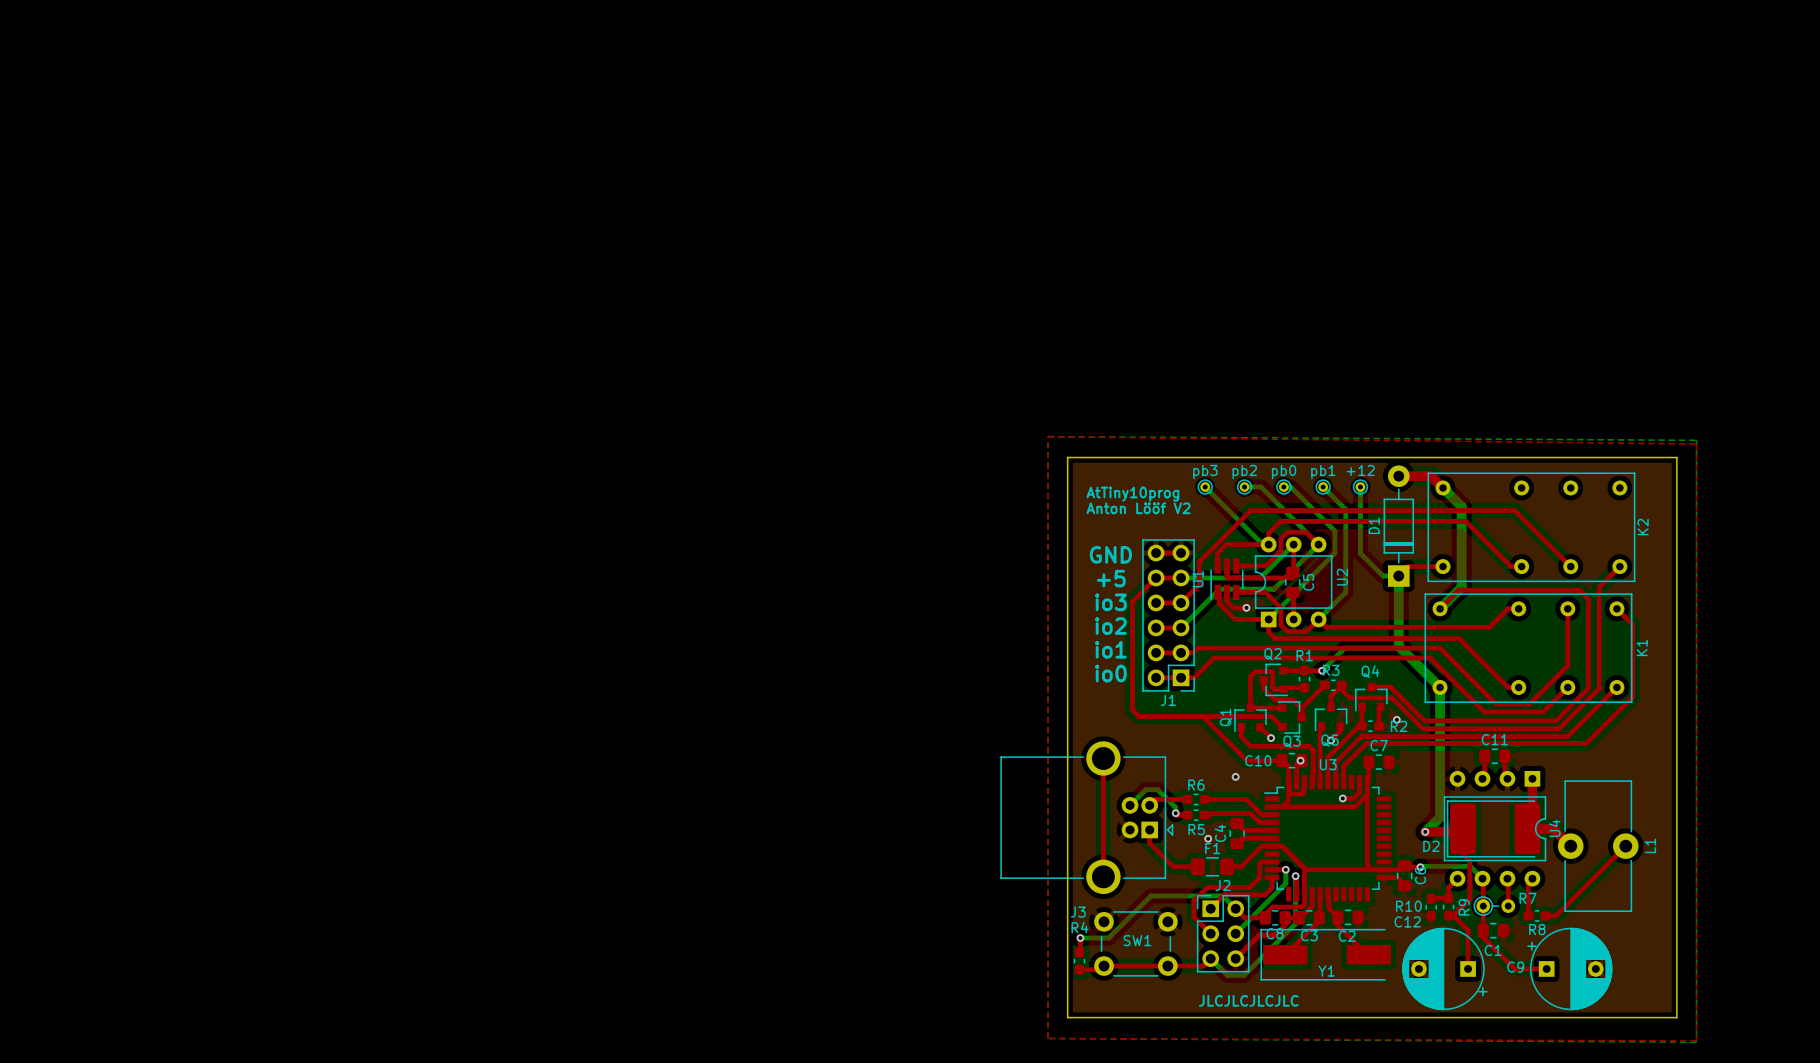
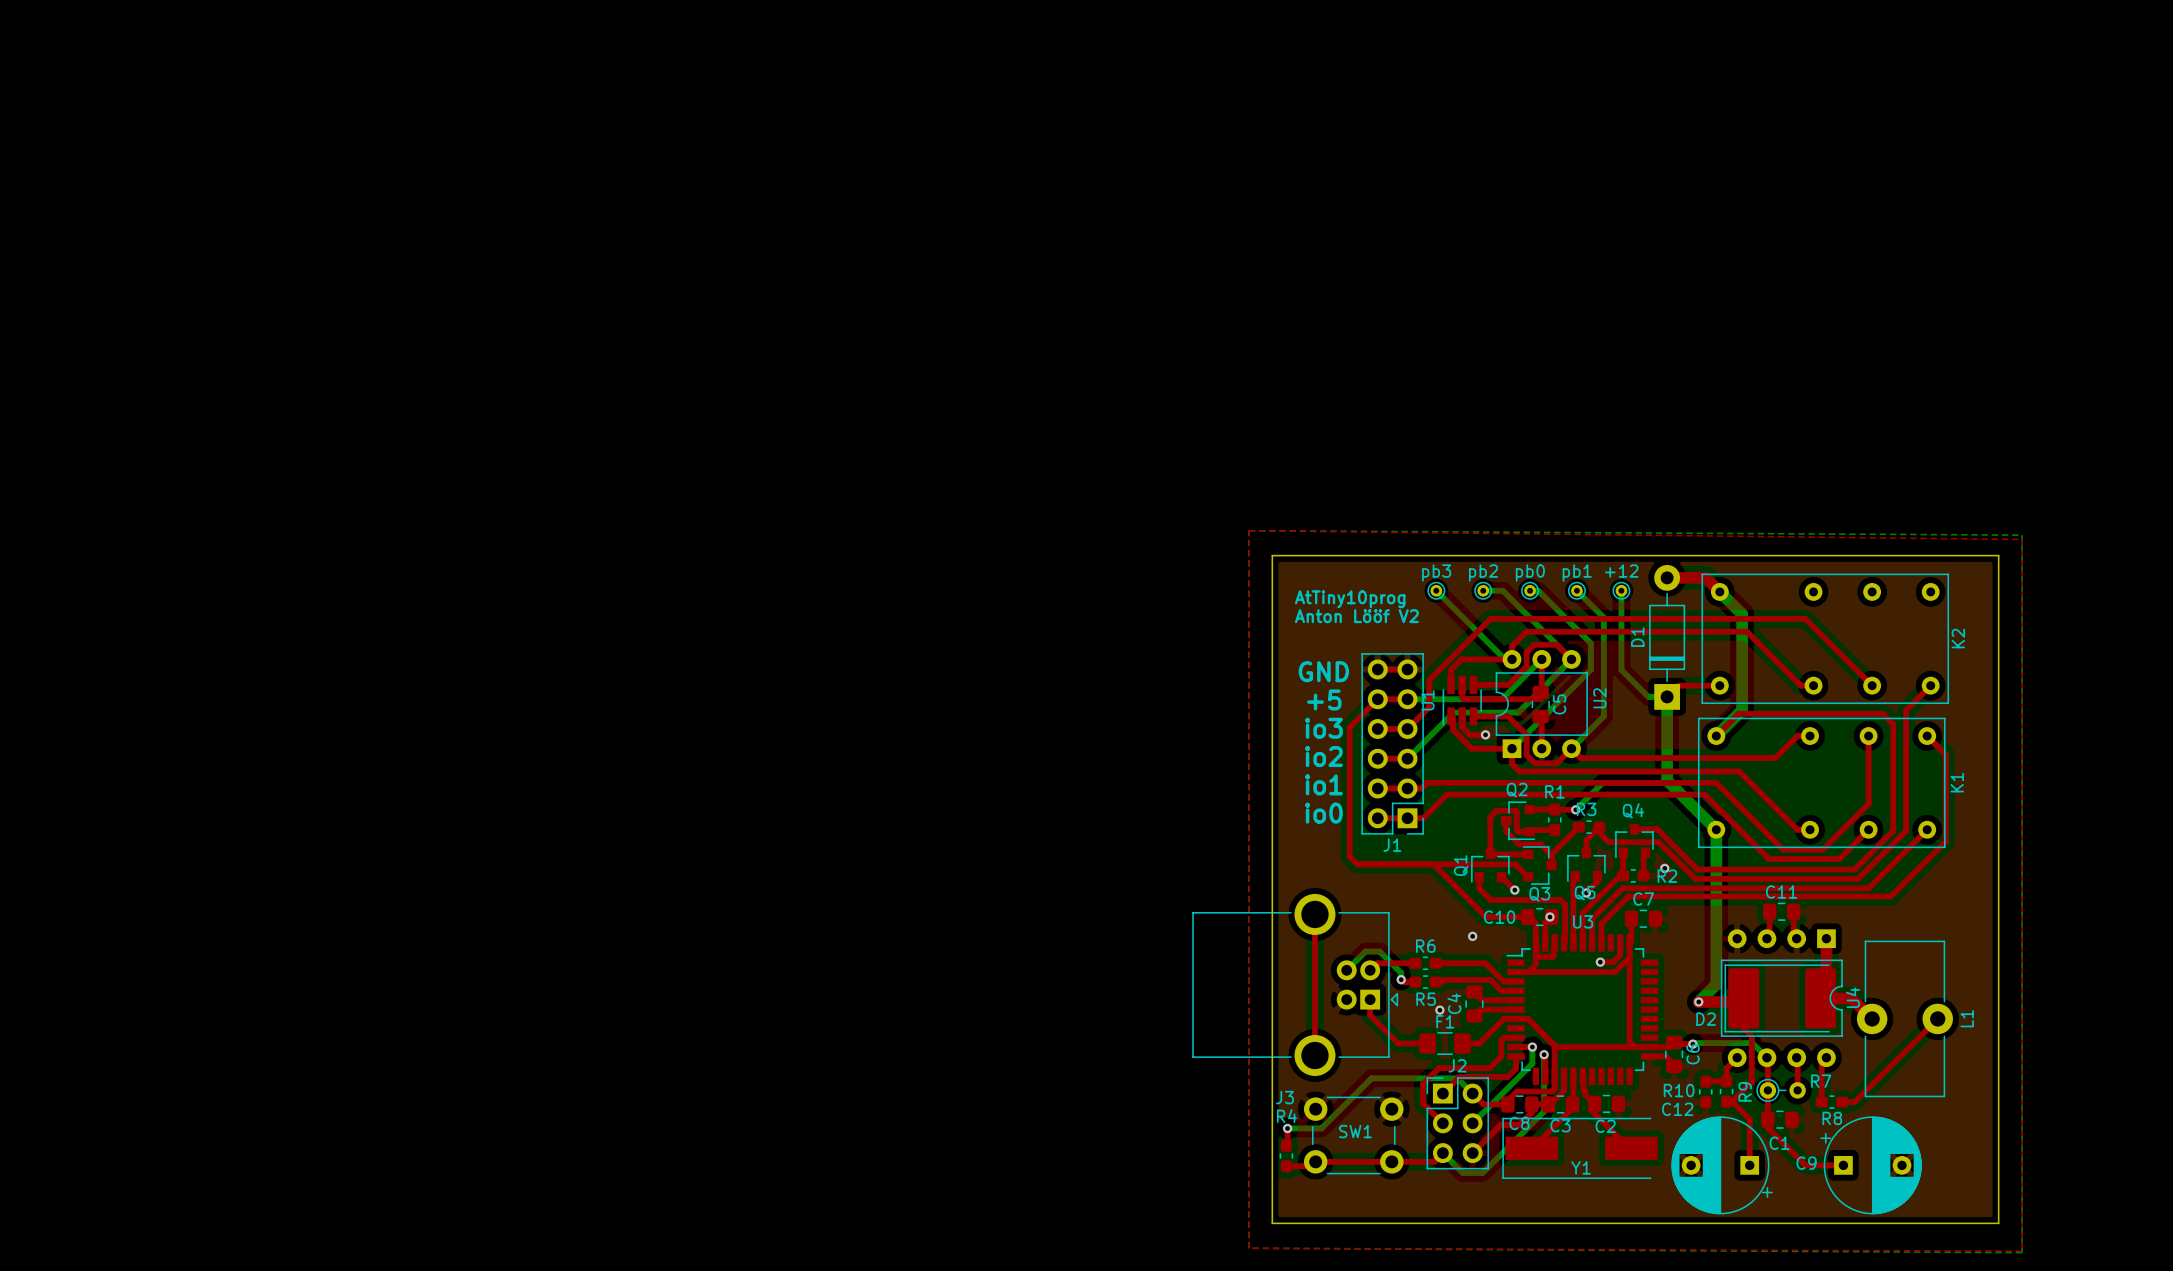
text: JLCJLCJLCJLC (1248, 1000) -> none

